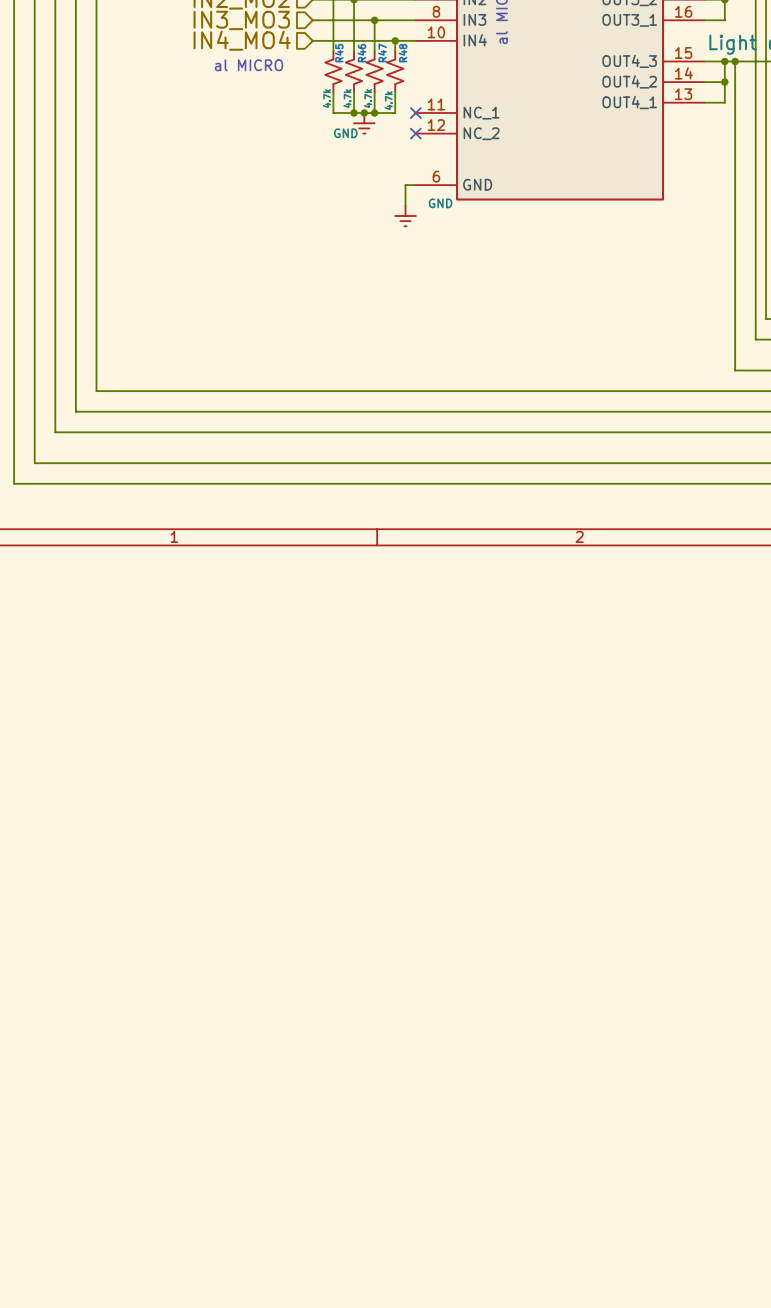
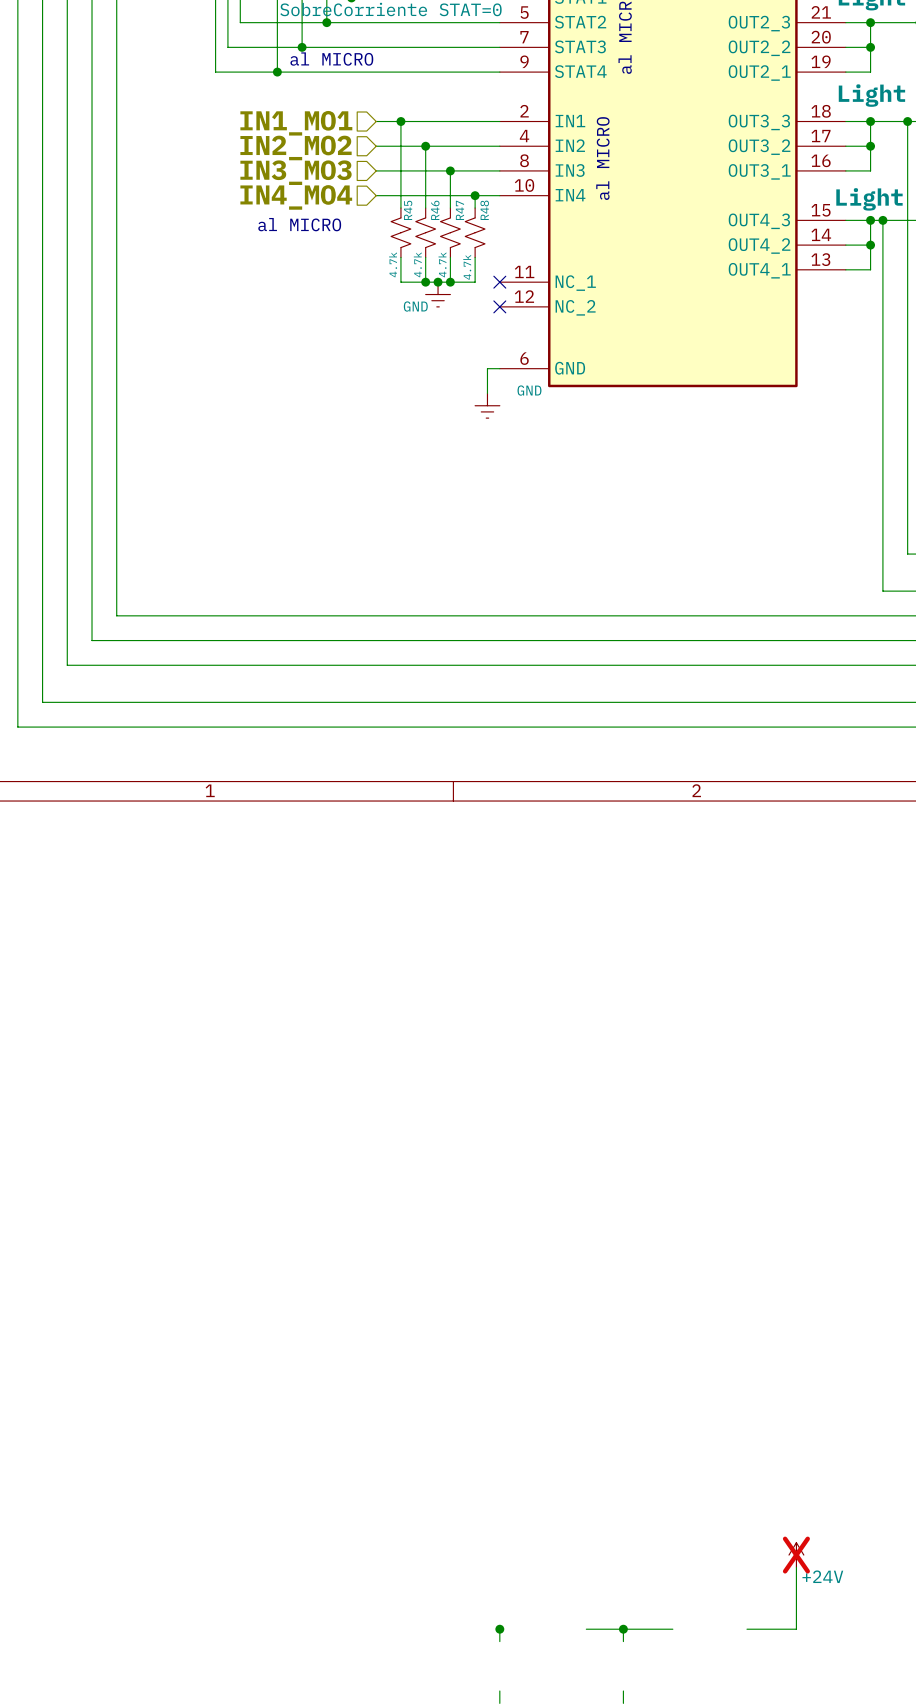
power symbol: none -> +24V (796, 1555)
wire: none -> (796, 1567) (796, 1629) (746, 1629)
wire: none -> (499, 1629) (499, 1641)
junction: none -> (499, 1629)
wire: none -> (586, 1629) (672, 1629)
wire: none -> (623, 1629) (623, 1641)
junction: none -> (623, 1629)
wire: none -> (499, 1691) (499, 1703)
wire: none -> (623, 1691) (623, 1703)

